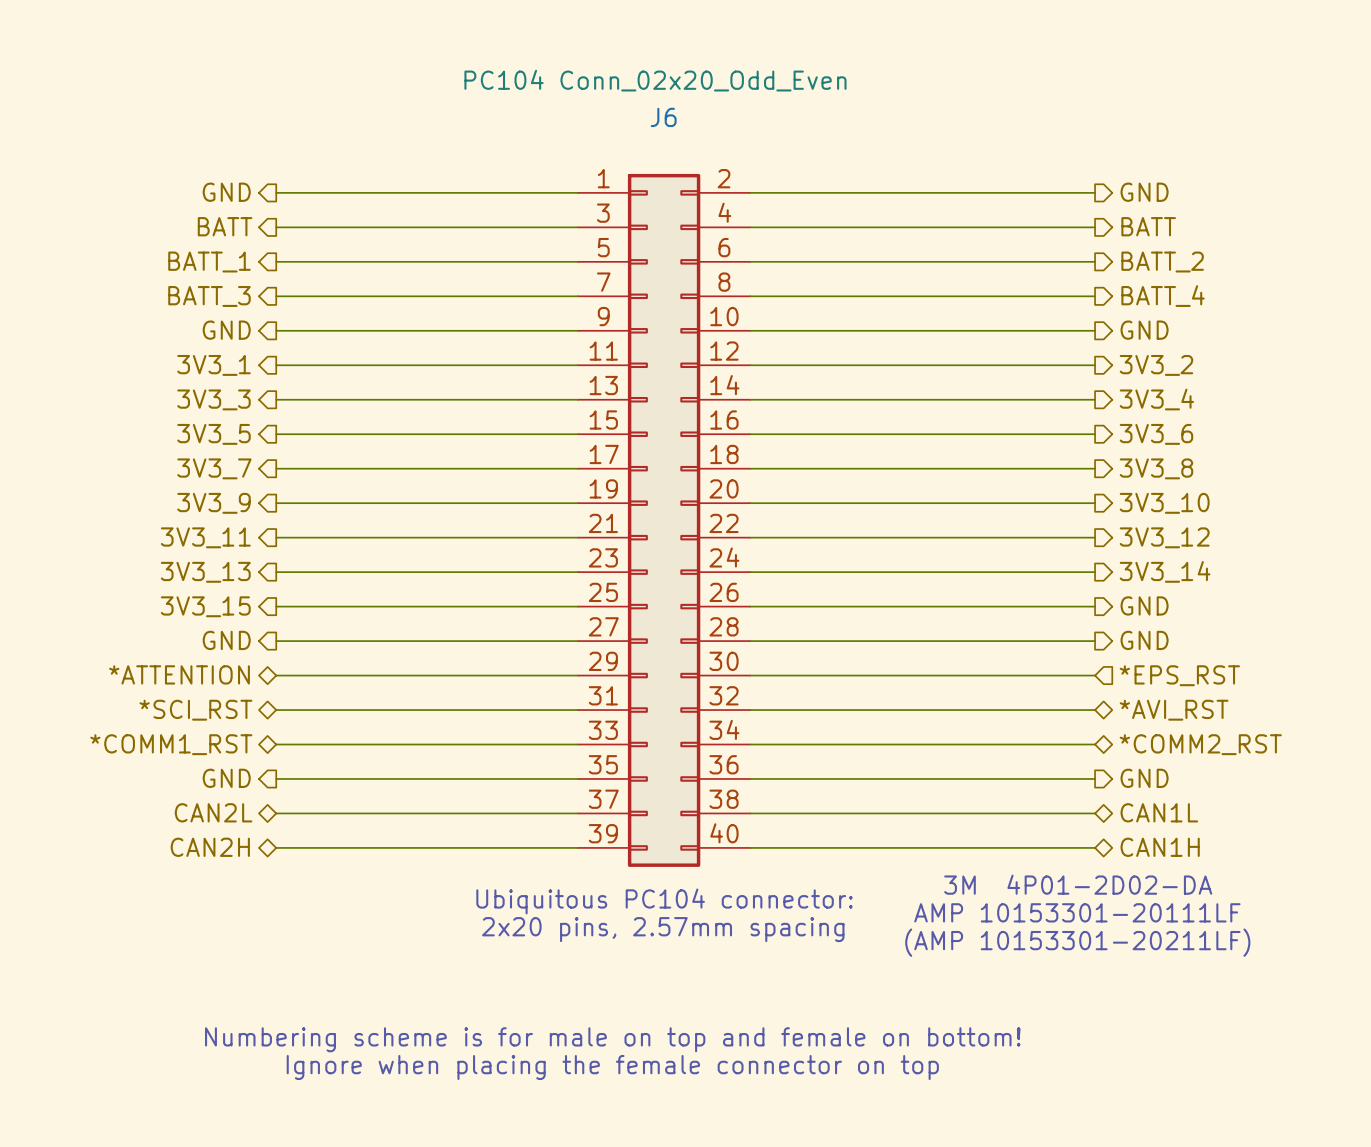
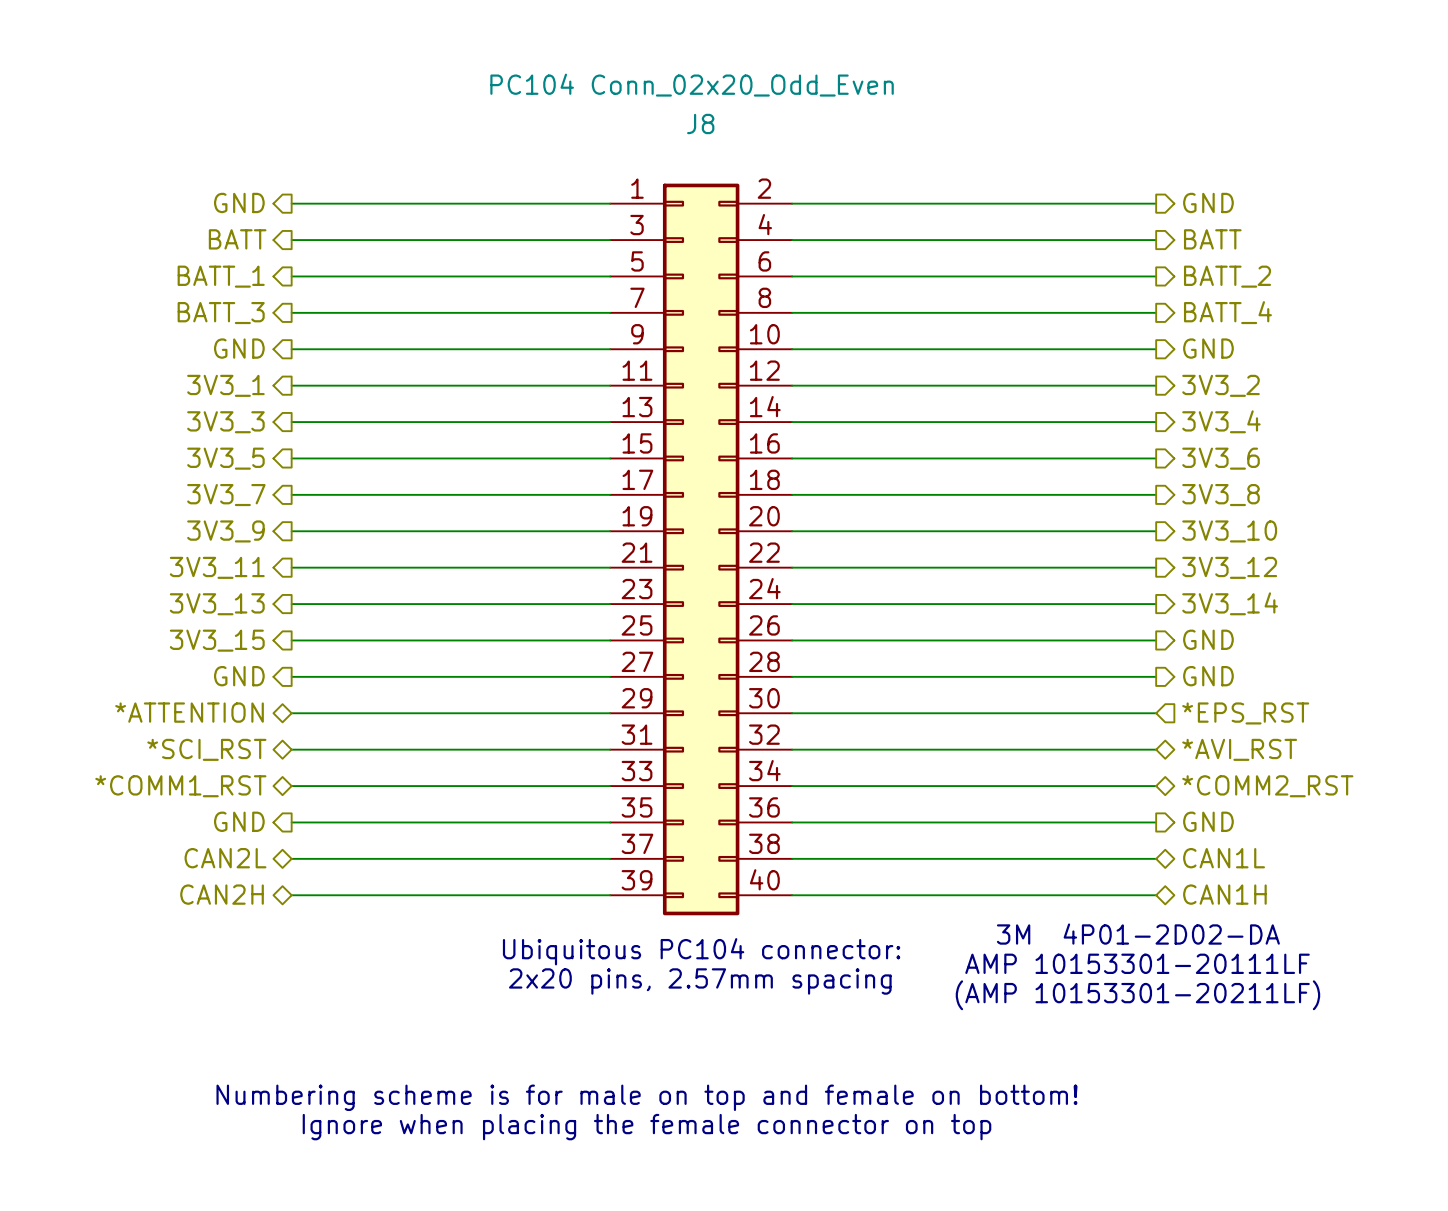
J6 name: J6 (663, 117) -> J8 (700, 123)

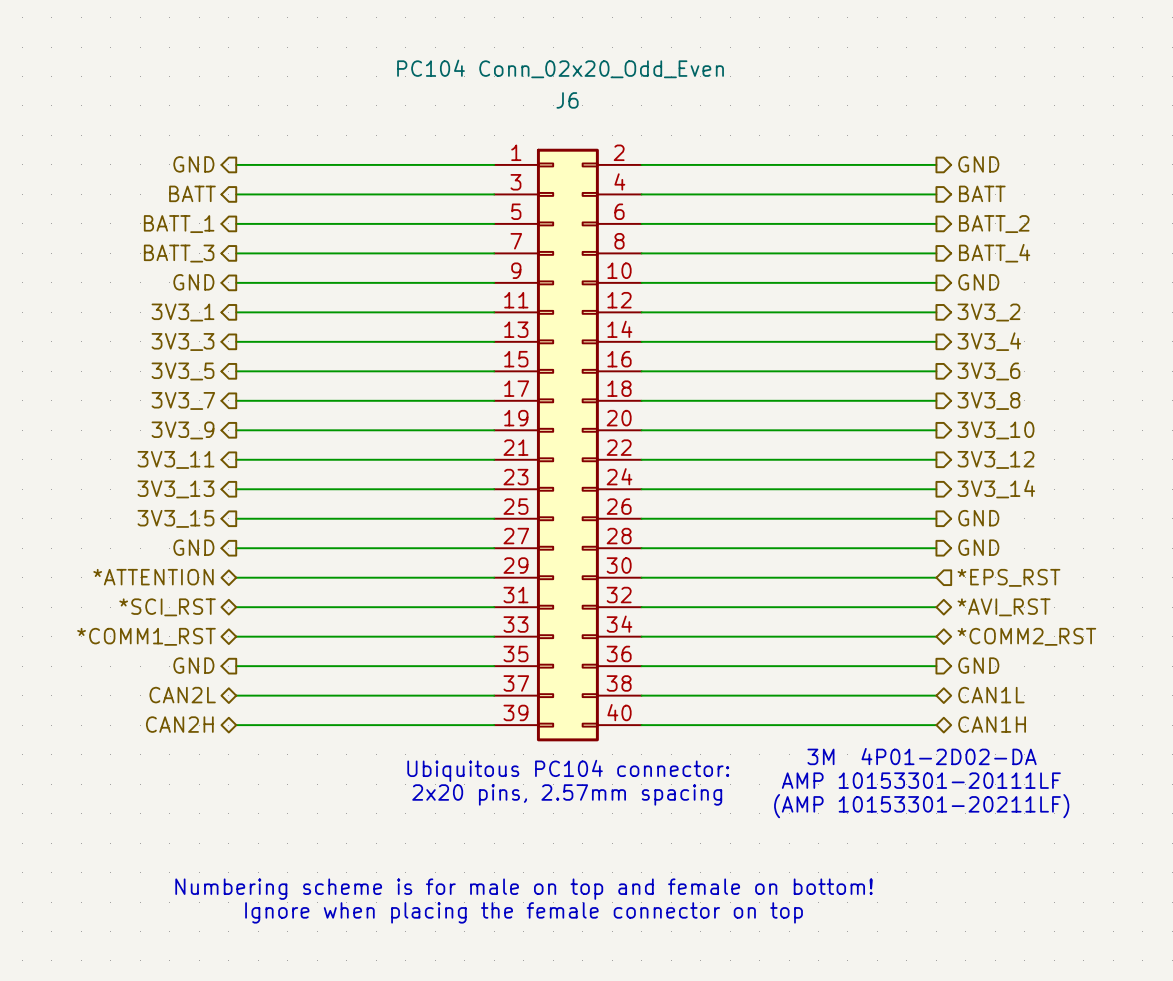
J8 name: J8 (700, 123) -> J6 (567, 100)

